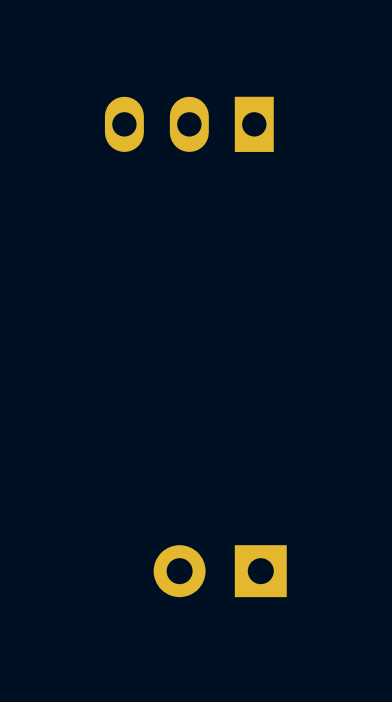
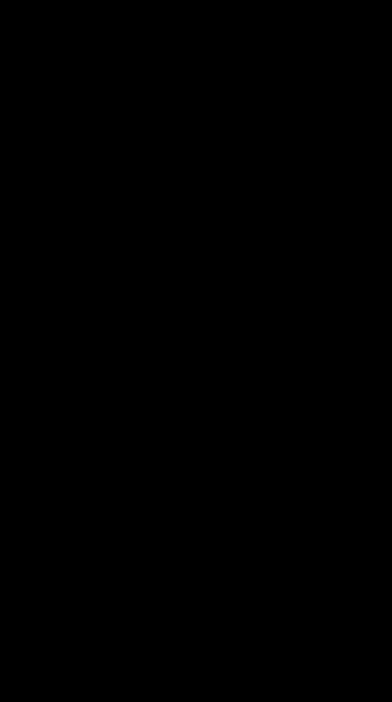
part: (189, 124) -> none
part: (220, 571) -> none

